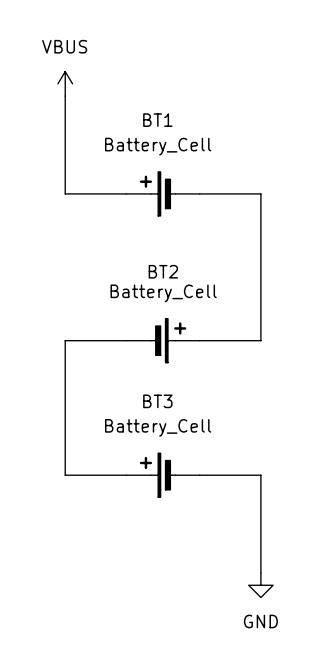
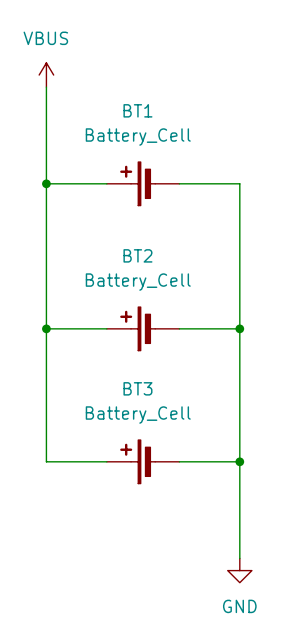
wire: none -> (46, 183) (46, 328)
junction: none -> (46, 183)
junction: none -> (46, 328)
BT2 flip: as is (168, 340) -> left-right (137, 328)
wire: none -> (239, 328) (239, 461)
junction: none -> (239, 328)
junction: none -> (239, 461)

